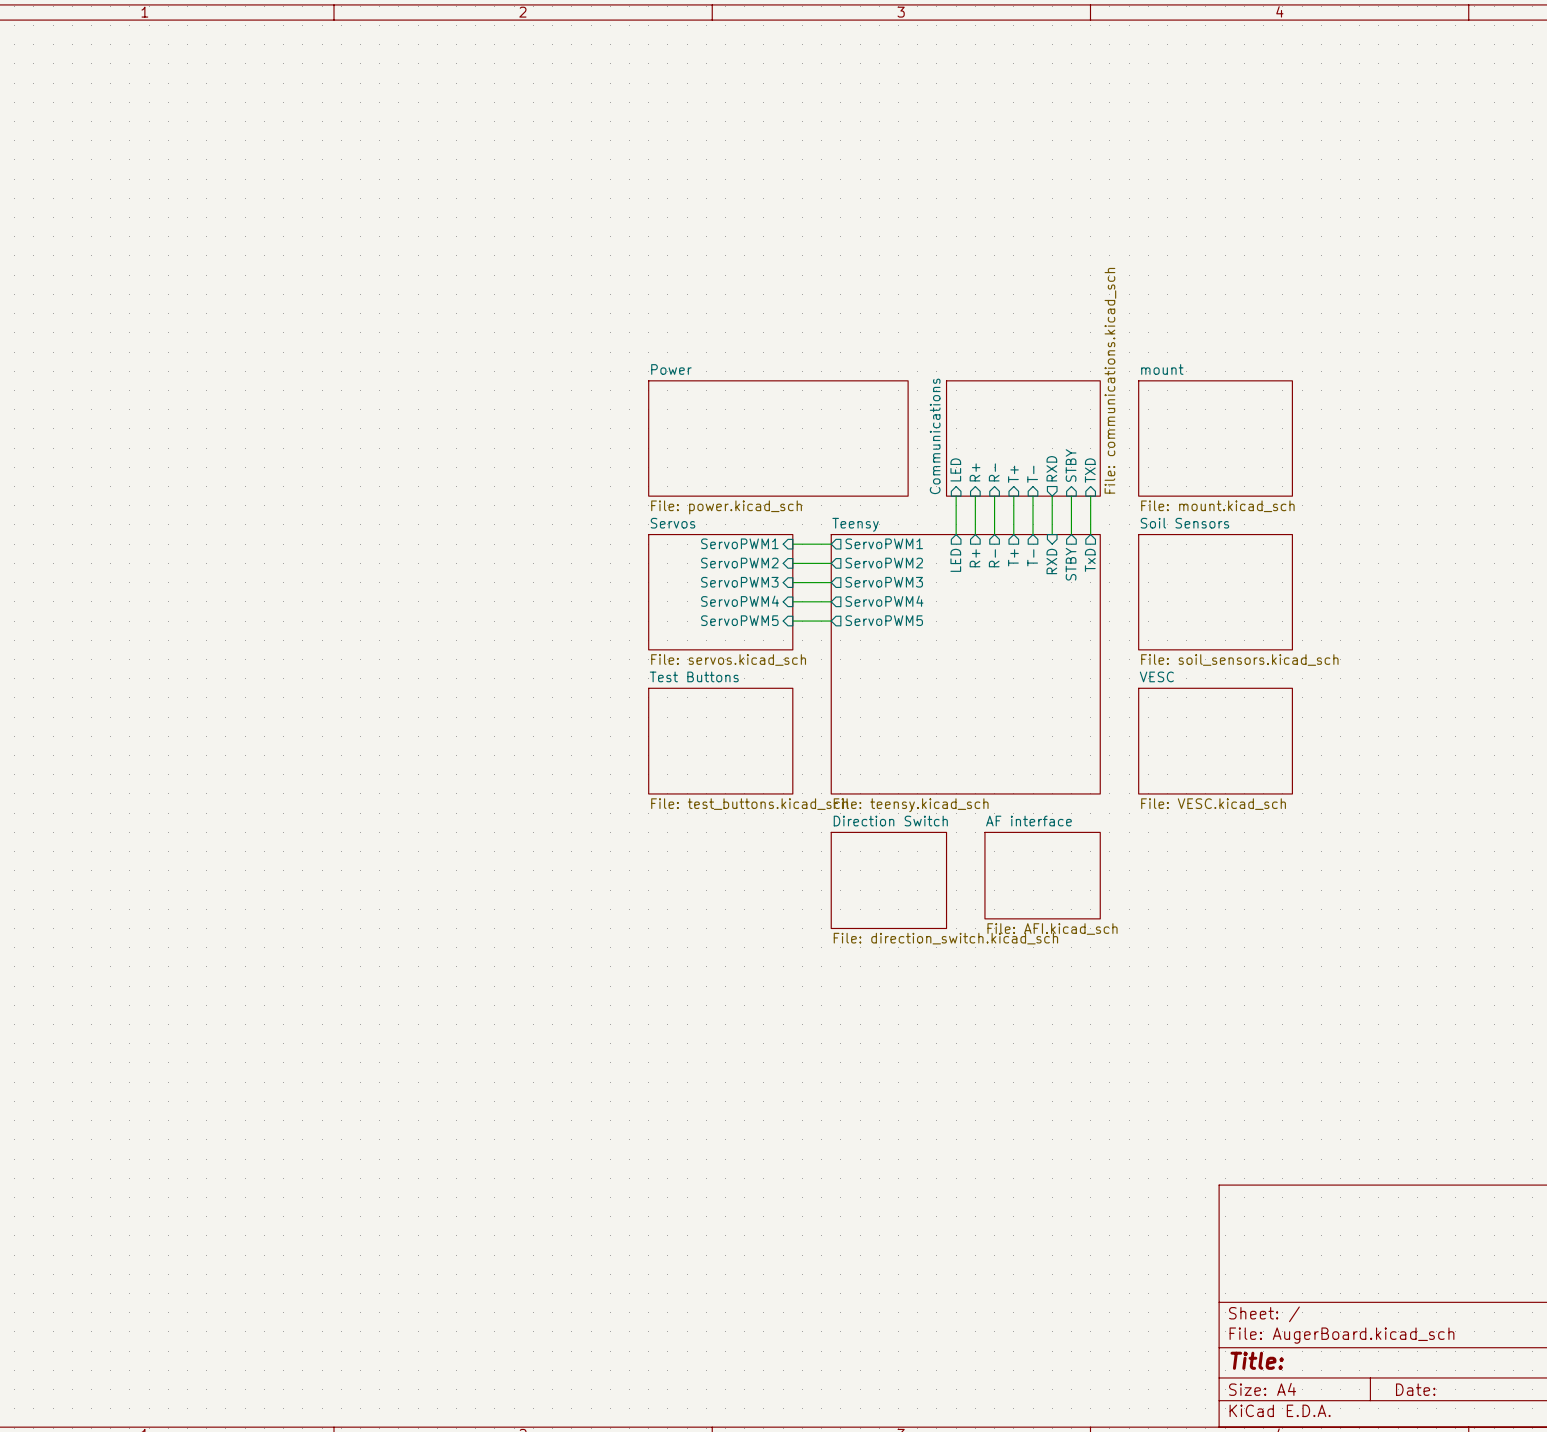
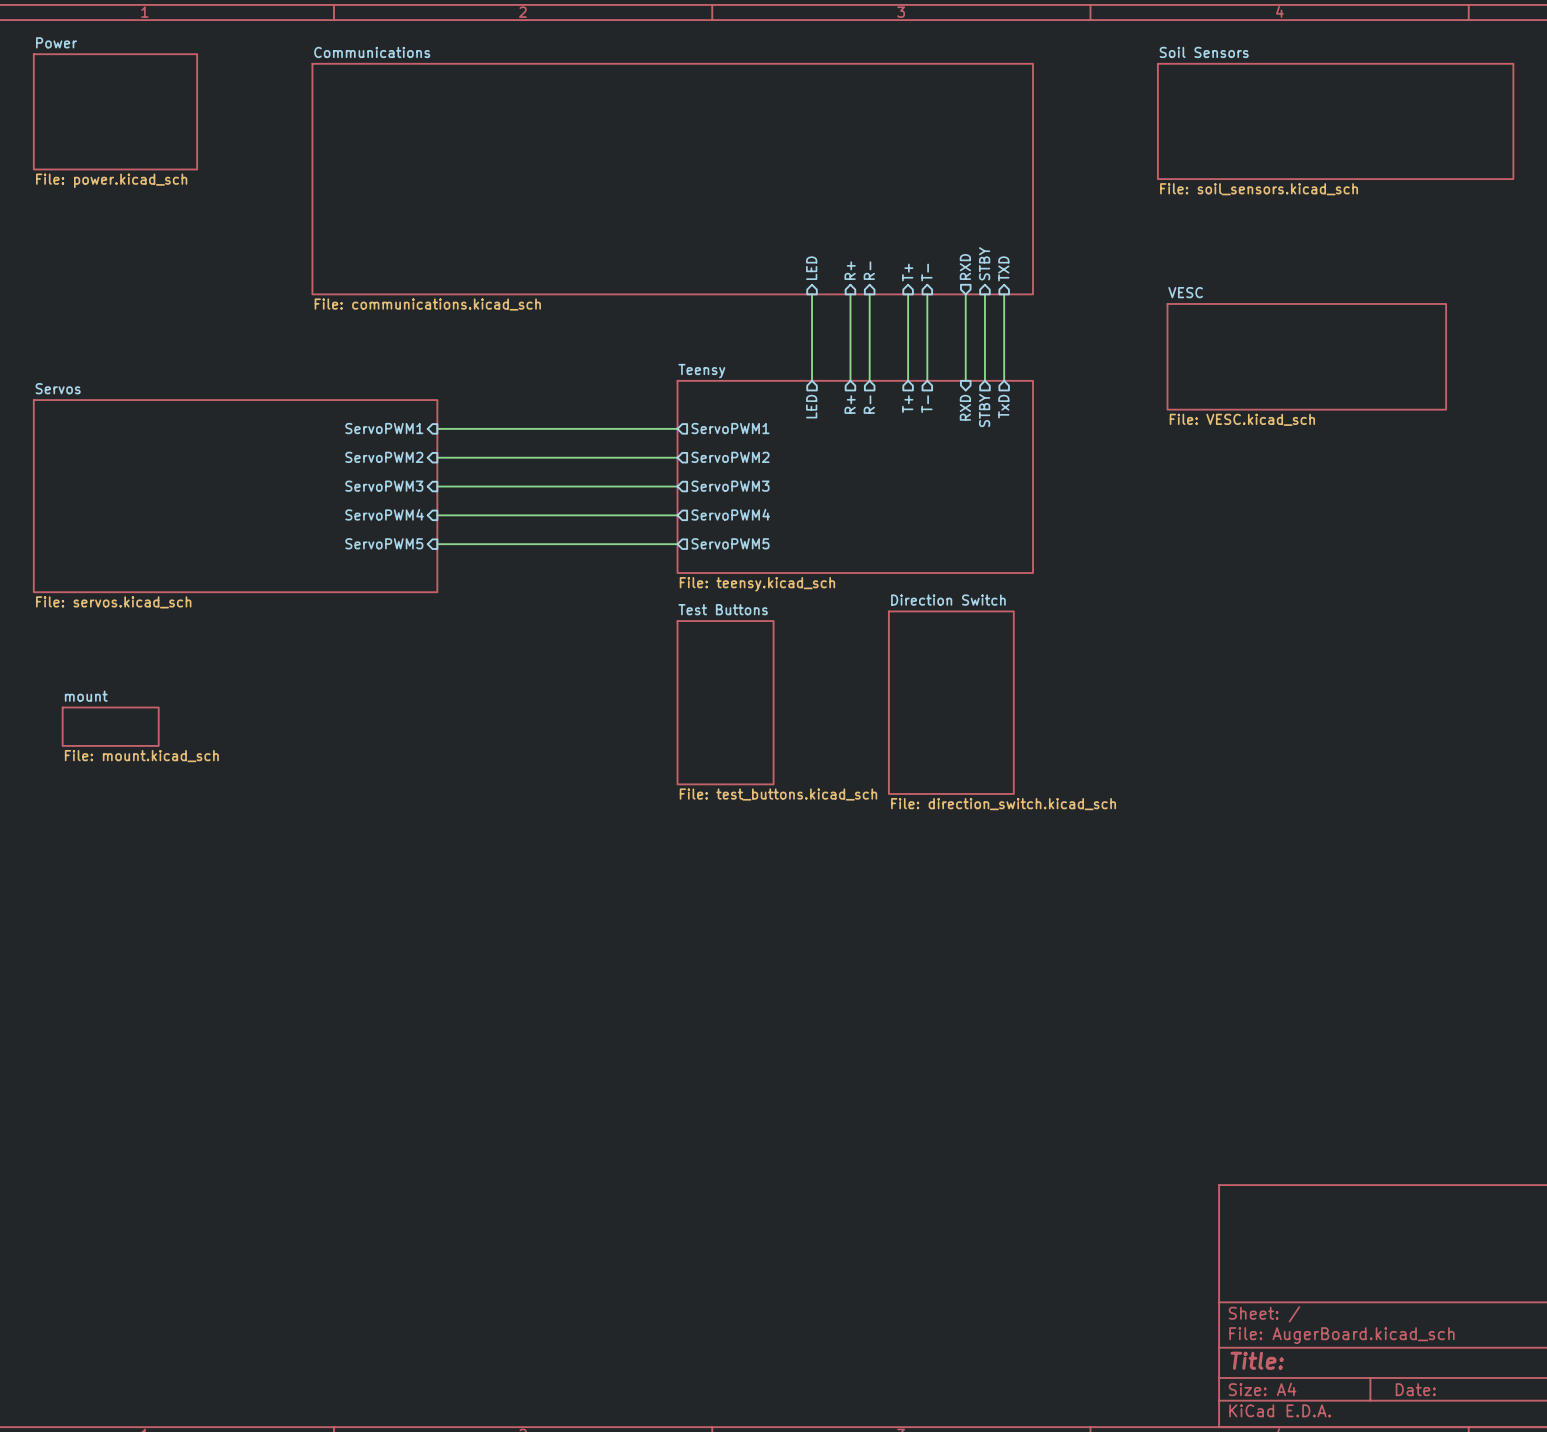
sheet Power: none -> File: power.kicad_sch (115, 111)
sheet Soil Sensors: none -> File: soil_sensors.kicad_sch (1335, 121)
sheet Communications: none -> File: communications.kicad_sch (672, 179)
sheet pin: none -> STBY (984, 263)
sheet pin: none -> RXD (965, 267)
sheet pin: none -> LED (811, 268)
sheet pin: none -> TXD (1003, 268)
sheet pin: none -> R+ (850, 270)
sheet pin: none -> R- (869, 270)
sheet pin: none -> T+ (907, 272)
sheet pin: none -> T- (926, 272)
wire: none -> (812, 294) (812, 380)
wire: none -> (850, 294) (850, 380)
wire: none -> (869, 294) (869, 380)
wire: none -> (908, 294) (908, 380)
wire: none -> (927, 294) (927, 380)
wire: none -> (965, 294) (965, 380)
wire: none -> (984, 294) (984, 380)
wire: none -> (1004, 294) (1004, 380)
sheet VESC: none -> File: VESC.kicad_sch (1306, 356)
sheet pin: none -> R+ (850, 404)
sheet pin: none -> R- (869, 404)
sheet pin: none -> T+ (907, 404)
sheet pin: none -> T- (926, 404)
sheet pin: none -> LED (811, 406)
sheet pin: none -> RXD (965, 407)
sheet pin: none -> STBY (984, 410)
sheet pin: none -> ServoPWM1 (384, 428)
wire: none -> (437, 428) (677, 428)
sheet pin: none -> ServoPWM1 (730, 428)
sheet Power: File: power.kicad_sch (778, 438) -> none
sheet Communications: File: communications.kicad_sch (1023, 438) -> none
sheet mount: File: mount.kicad_sch (1215, 438) -> none
sheet pin: none -> ServoPWM2 (384, 457)
wire: none -> (437, 457) (677, 457)
sheet pin: none -> ServoPWM2 (730, 457)
sheet pin: STBY (1071, 465) -> none
sheet pin: RXD (1051, 468) -> none
sheet pin: LED (955, 469) -> none
sheet pin: TXD (1090, 470) -> none
sheet pin: R+ (974, 472) -> none
sheet pin: R- (994, 472) -> none
sheet pin: T+ (1013, 474) -> none
sheet pin: T- (1032, 474) -> none
sheet Teensy: none -> File: teensy.kicad_sch (855, 476)
sheet pin: none -> ServoPWM3 (384, 486)
wire: none -> (437, 486) (677, 486)
sheet pin: none -> ServoPWM3 (730, 486)
sheet Servos: none -> File: servos.kicad_sch (235, 496)
wire: (956, 496) (956, 534) -> none
wire: (975, 496) (975, 534) -> none
wire: (994, 496) (994, 534) -> none
wire: (1013, 496) (1013, 534) -> none
wire: (1052, 496) (1052, 534) -> none
wire: (1071, 496) (1071, 534) -> none
wire: (1090, 496) (1090, 534) -> none
sheet pin: none -> ServoPWM4 (384, 514)
sheet pin: none -> ServoPWM4 (730, 514)
wire: none -> (437, 515) (677, 515)
sheet pin: none -> ServoPWM5 (384, 543)
sheet pin: none -> ServoPWM5 (730, 543)
sheet pin: ServoPWM1 (739, 543) -> none
sheet pin: ServoPWM1 (884, 543) -> none
wire: none -> (437, 544) (677, 544)
wire: (792, 544) (831, 544) -> none
sheet pin: T+ (1013, 557) -> none
sheet pin: T- (1032, 557) -> none
sheet pin: R+ (974, 558) -> none
sheet pin: R- (994, 558) -> none
sheet pin: LED (955, 560) -> none
sheet pin position: TxD (1090, 560) -> TxD (1003, 406)
sheet pin: RXD (1051, 561) -> none
sheet pin: ServoPWM2 (739, 563) -> none
wire: (792, 563) (831, 563) -> none
sheet pin: ServoPWM2 (884, 563) -> none
sheet pin: STBY (1071, 564) -> none
sheet pin: ServoPWM3 (739, 582) -> none
wire: (792, 582) (831, 582) -> none
sheet pin: ServoPWM3 (884, 582) -> none
sheet Servos: File: servos.kicad_sch (720, 592) -> none
sheet Soil Sensors: File: soil_sensors.kicad_sch (1215, 592) -> none
sheet pin: ServoPWM4 (740, 601) -> none
wire: (792, 601) (831, 601) -> none
sheet pin: ServoPWM4 (884, 601) -> none
sheet pin: ServoPWM5 (739, 620) -> none
sheet pin: ServoPWM5 (884, 620) -> none
wire: (792, 621) (831, 621) -> none
sheet Teensy: File: teensy.kicad_sch (965, 664) -> none
sheet Test Buttons: none -> File: test_buttons.kicad_sch (725, 702)
sheet Direction Switch: none -> File: direction_switch.kicad_sch (951, 702)
sheet mount: none -> File: mount.kicad_sch (110, 726)
sheet Test Buttons: File: test_buttons.kicad_sch (720, 741) -> none
sheet VESC: File: VESC.kicad_sch (1215, 741) -> none
sheet AF interface: File: AFI.kicad_sch (1042, 875) -> none
sheet Direction Switch: File: direction_switch.kicad_sch (888, 880) -> none

